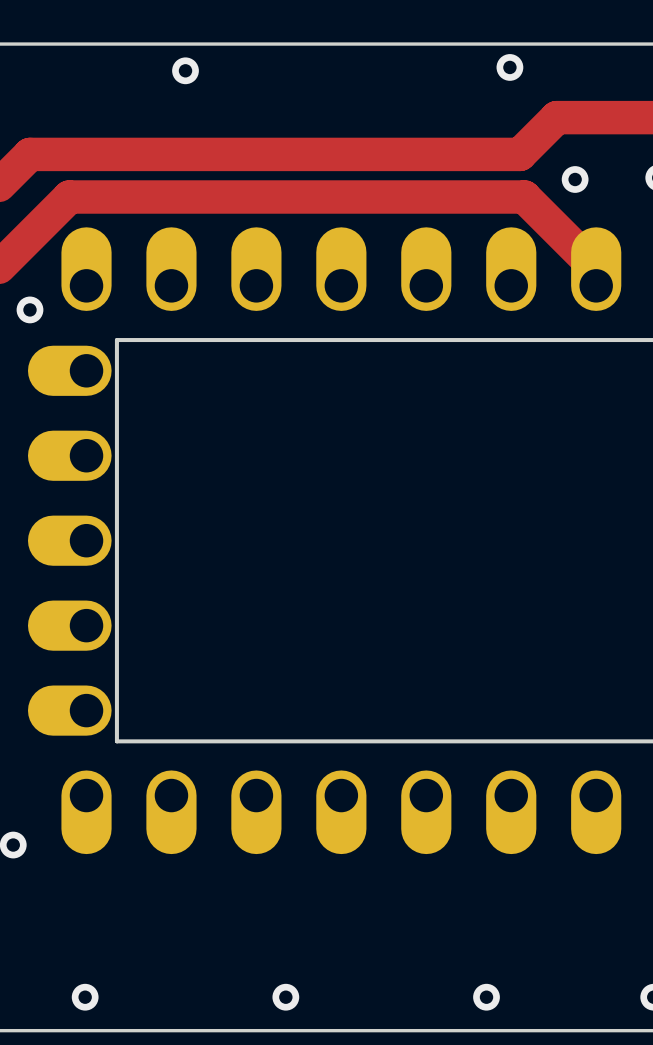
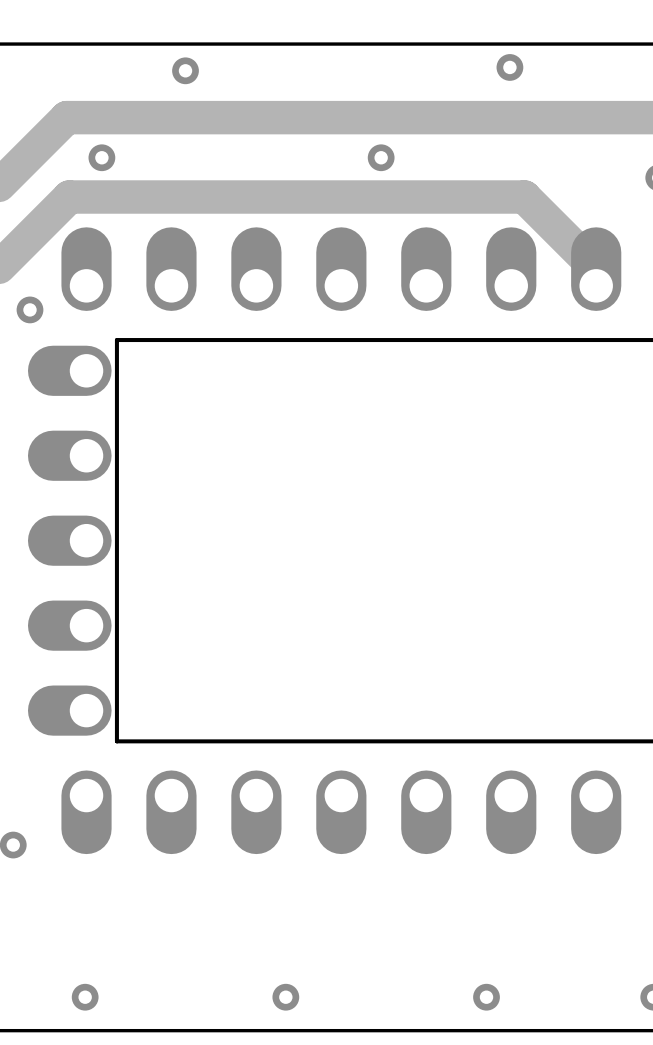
track: (556, 117) (519, 154) (29, 154) -> (556, 117) (66, 117) (29, 154)
via: none -> (101, 157)
via position: (575, 179) -> (381, 157)

